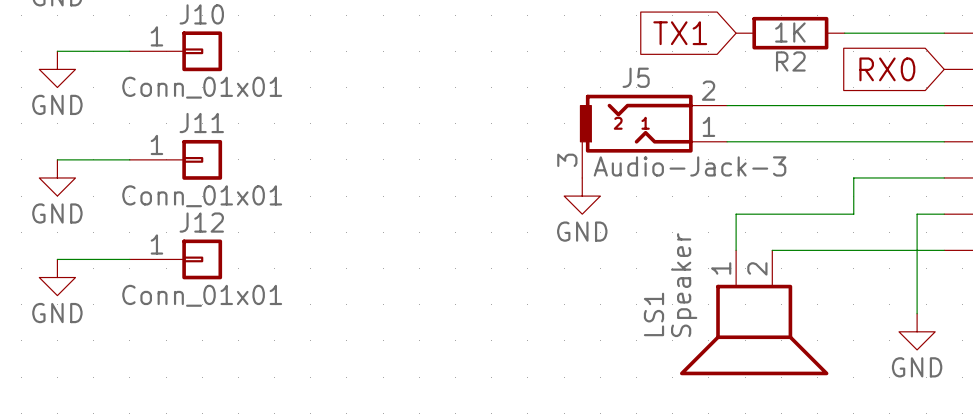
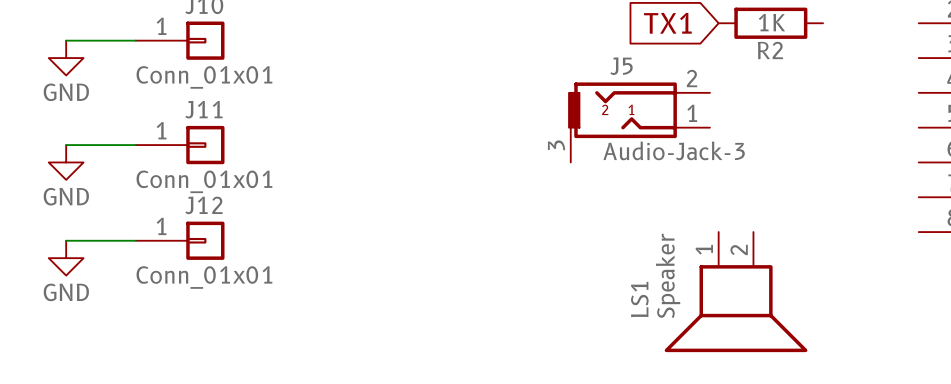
wire: (844, 33) (944, 33) -> none
global label: RX0 (887, 69) -> none
wire: (727, 105) (944, 105) -> none
wire: (727, 141) (944, 141) -> none
wire: (944, 177) (853, 177) (853, 214) (736, 214) (736, 250) -> none
power symbol: GND (582, 196) -> none
wire: (944, 214) (917, 214) (917, 313) -> none
wire: (772, 250) (944, 250) -> none
power symbol: GND (917, 331) -> none

